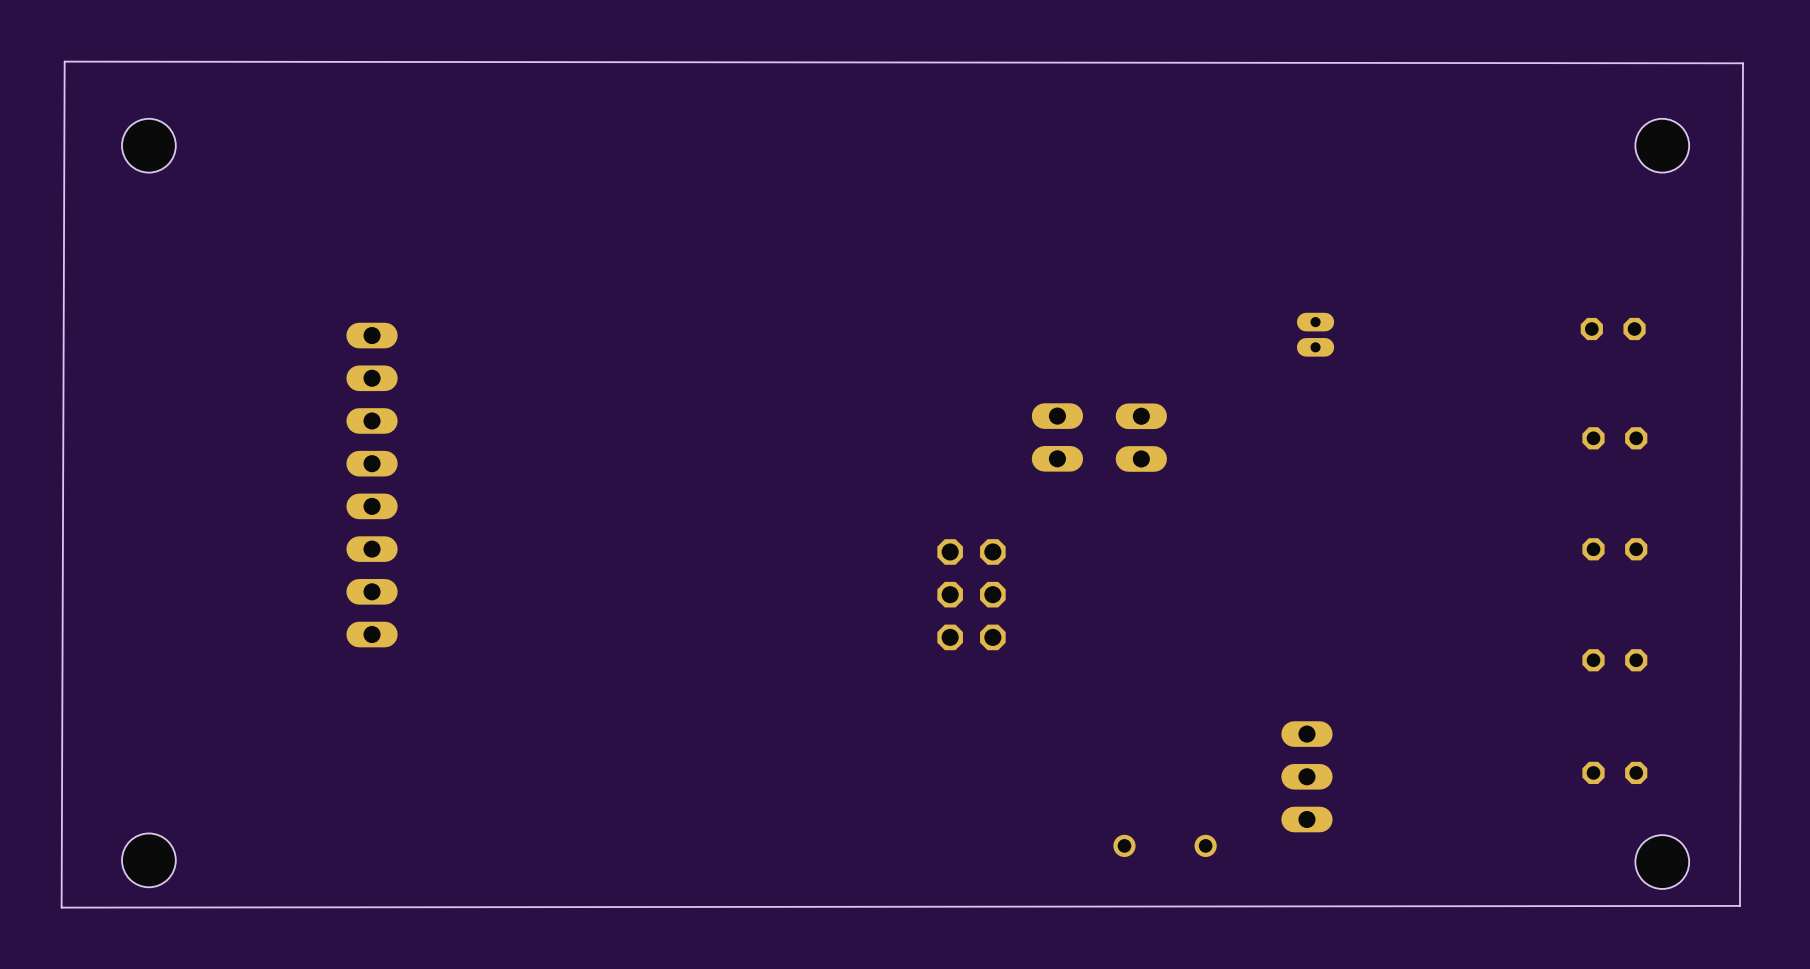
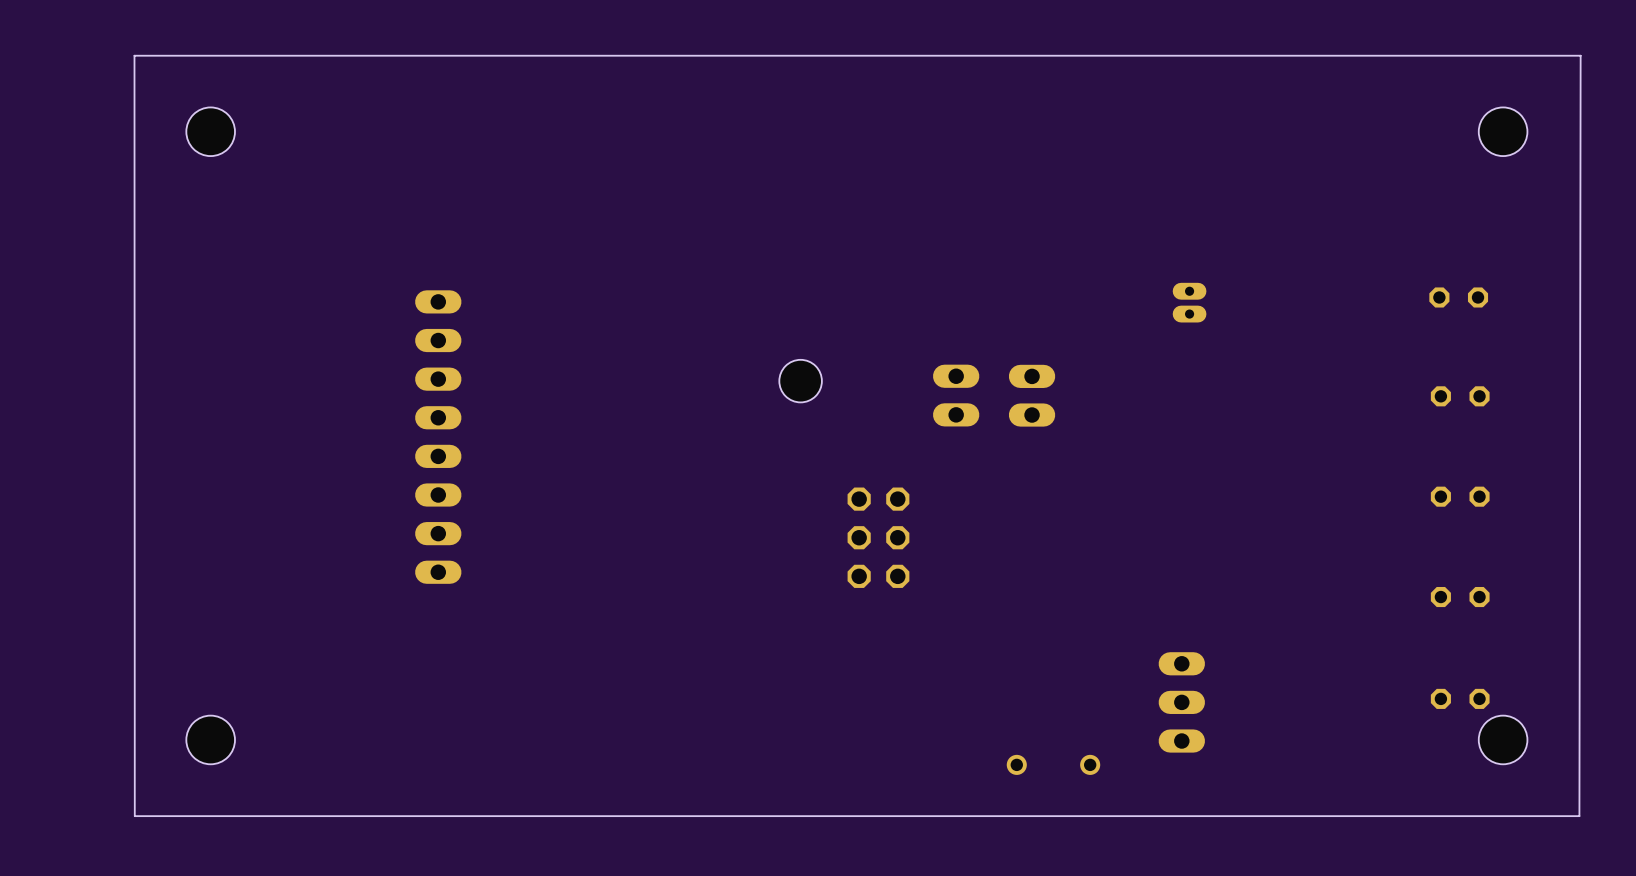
board edge: (64, 61) (61, 907) (1739, 905) (1742, 63) (64, 61) -> (1580, 55) (1579, 816) (134, 816) (134, 55) (1580, 55)
hole position: (148, 145) -> (210, 131)
hole: none -> (800, 381)
part position: (372, 485) -> (438, 437)
hole position: (148, 860) -> (210, 739)
hole position: (1662, 862) -> (1503, 739)

